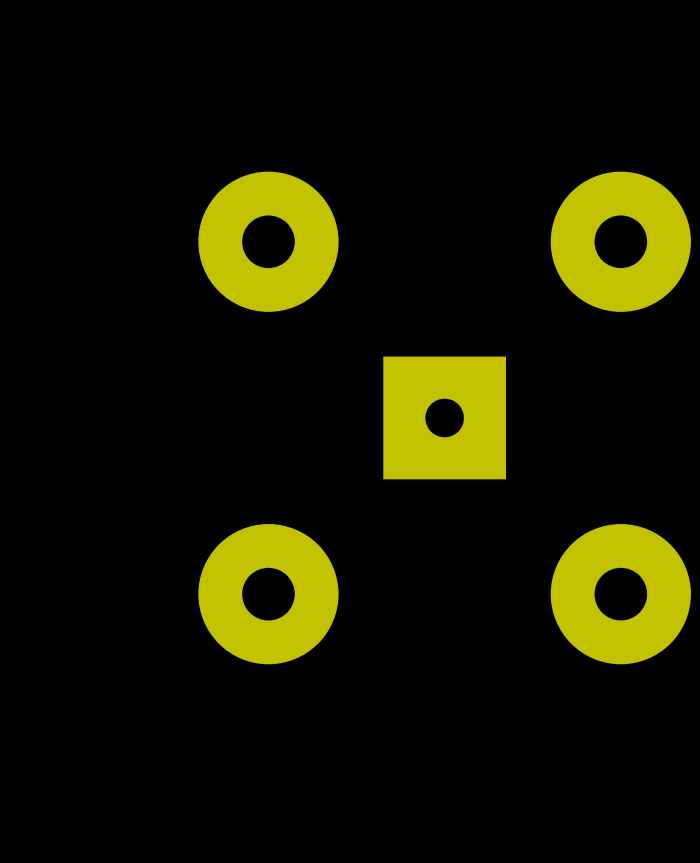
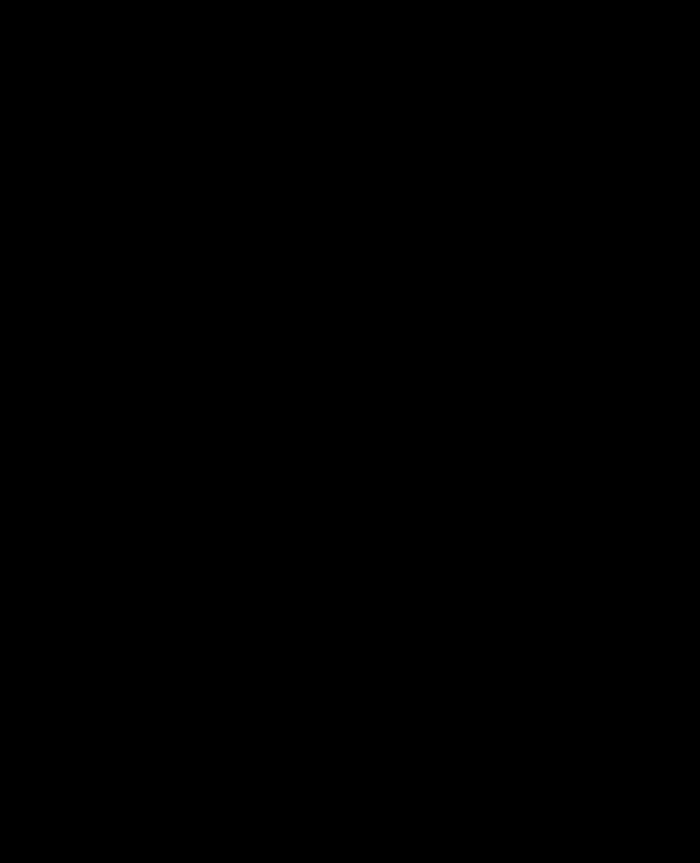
part: (444, 417) -> none

